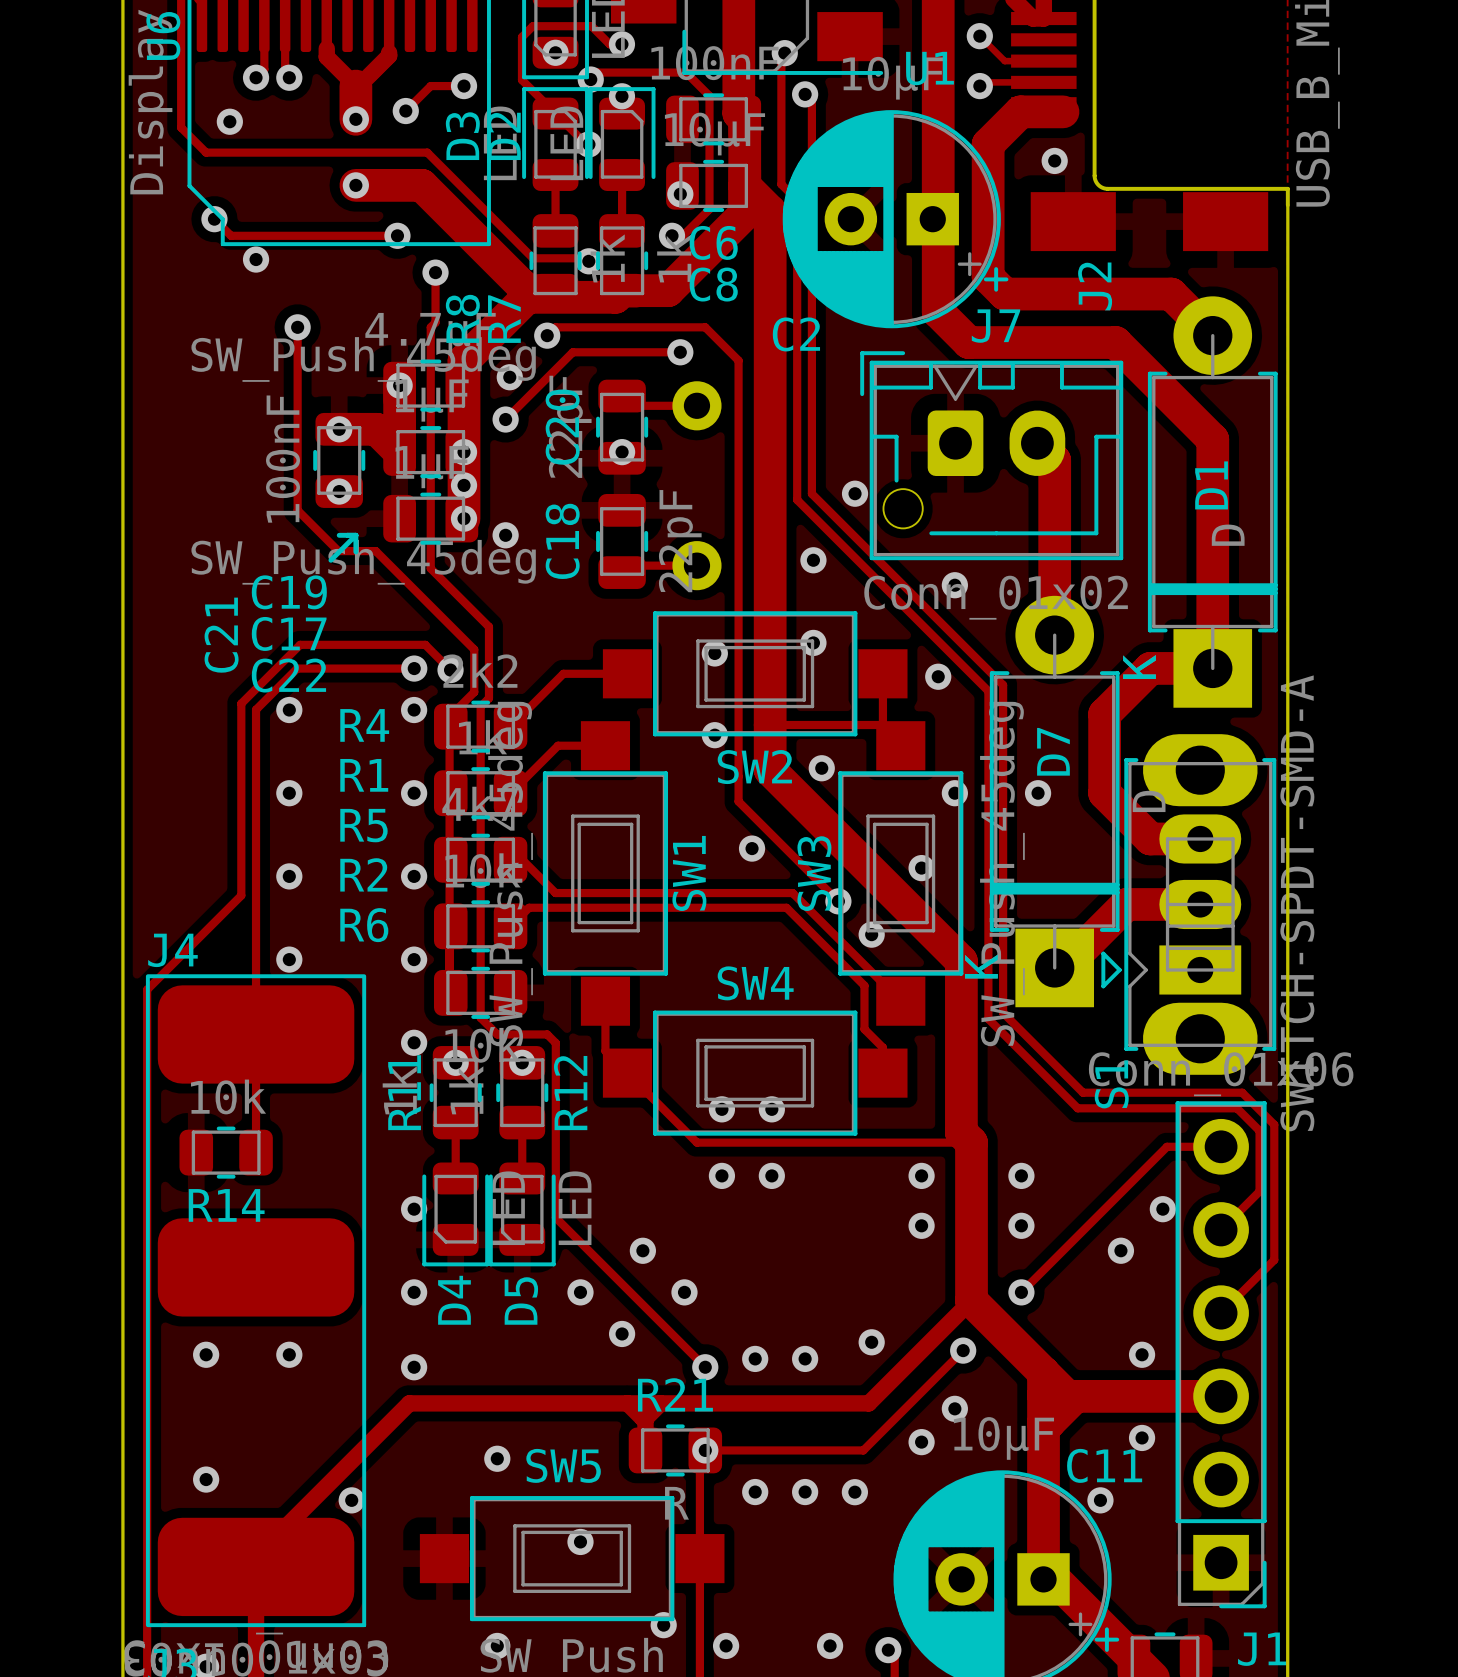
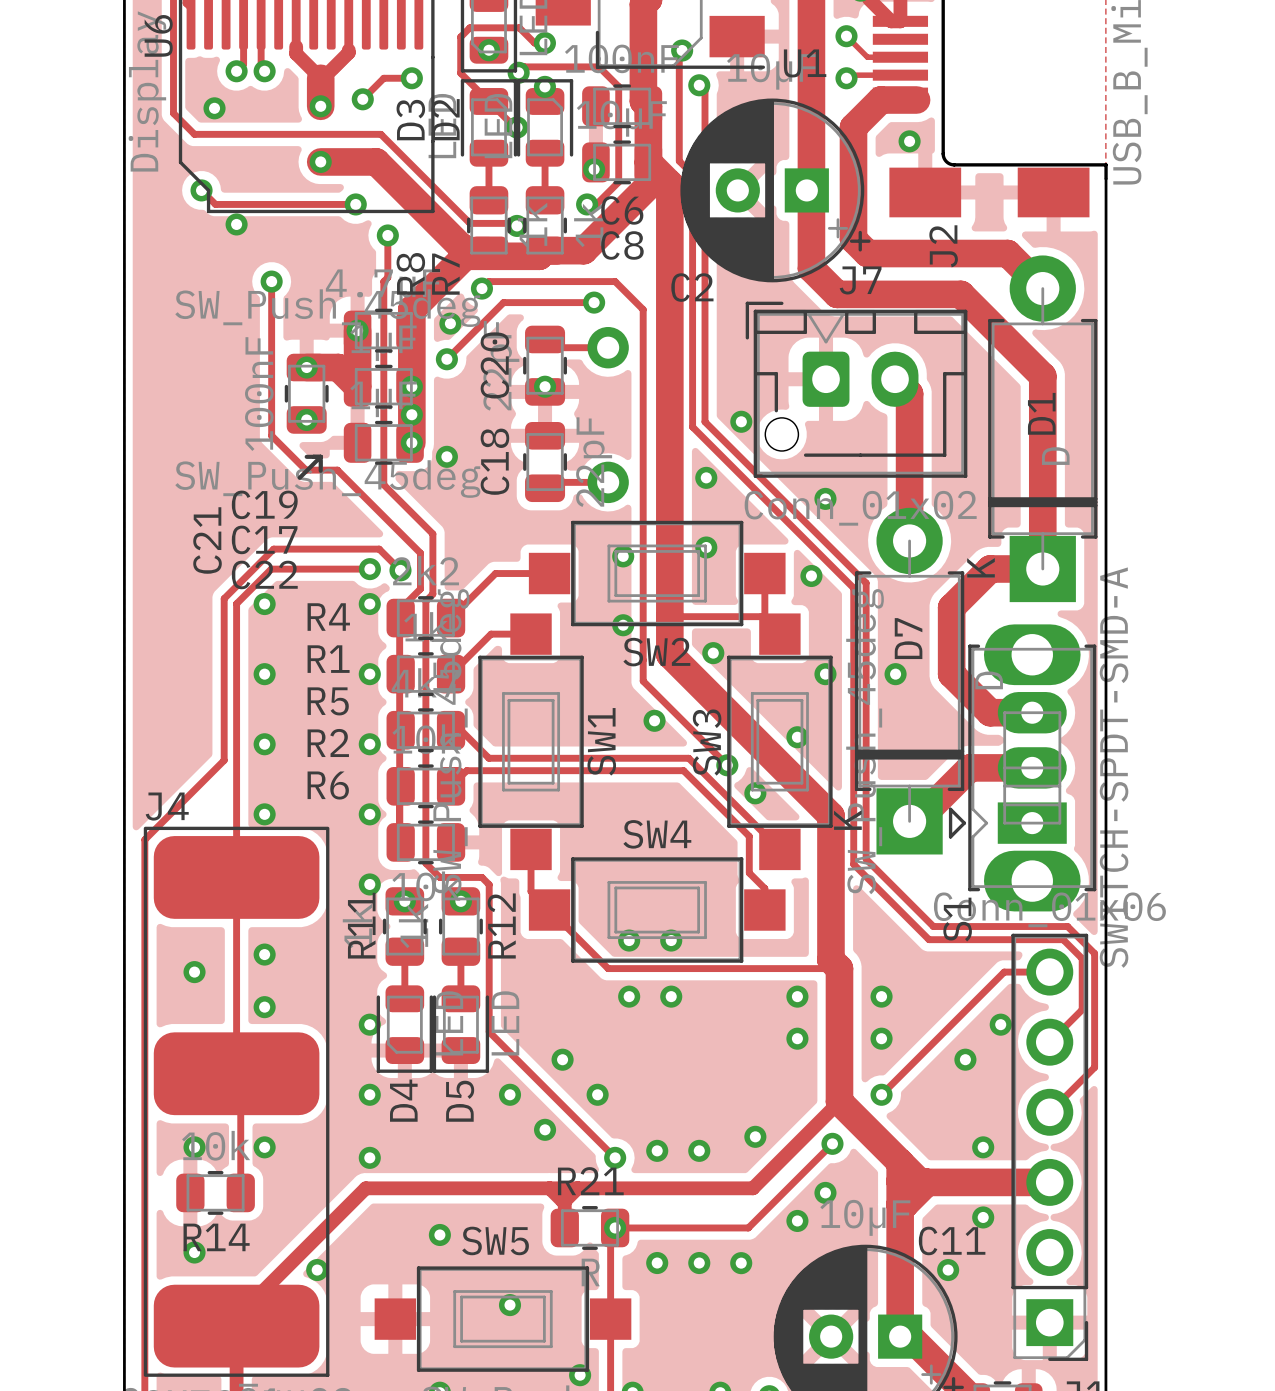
via: none -> (264, 954)
via: none -> (194, 972)
R14 position: (226, 1152) -> (215, 1192)
track: none -> (236, 977) (236, 1073)
via: none -> (264, 1007)
track: none -> (240, 1077) (240, 1192)

